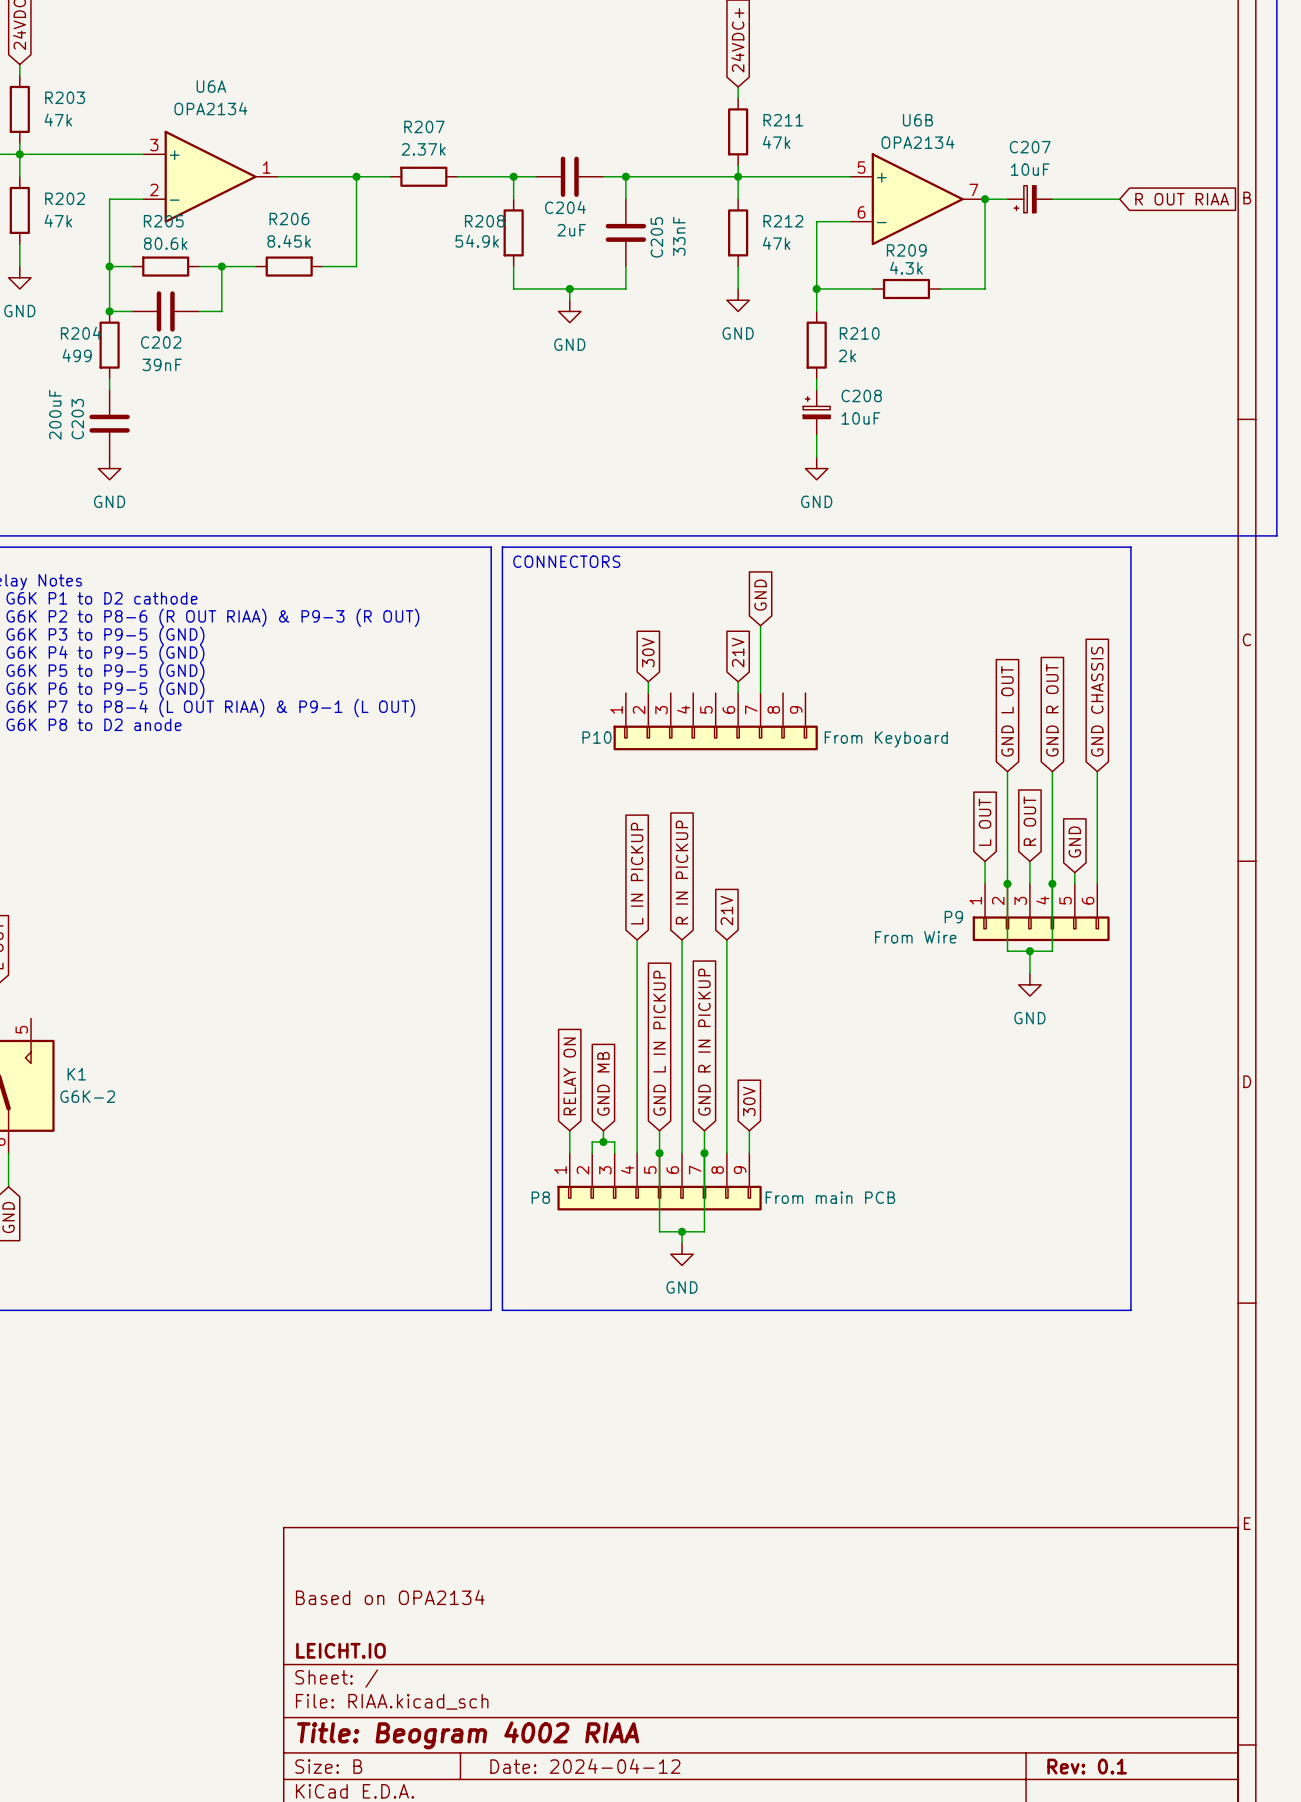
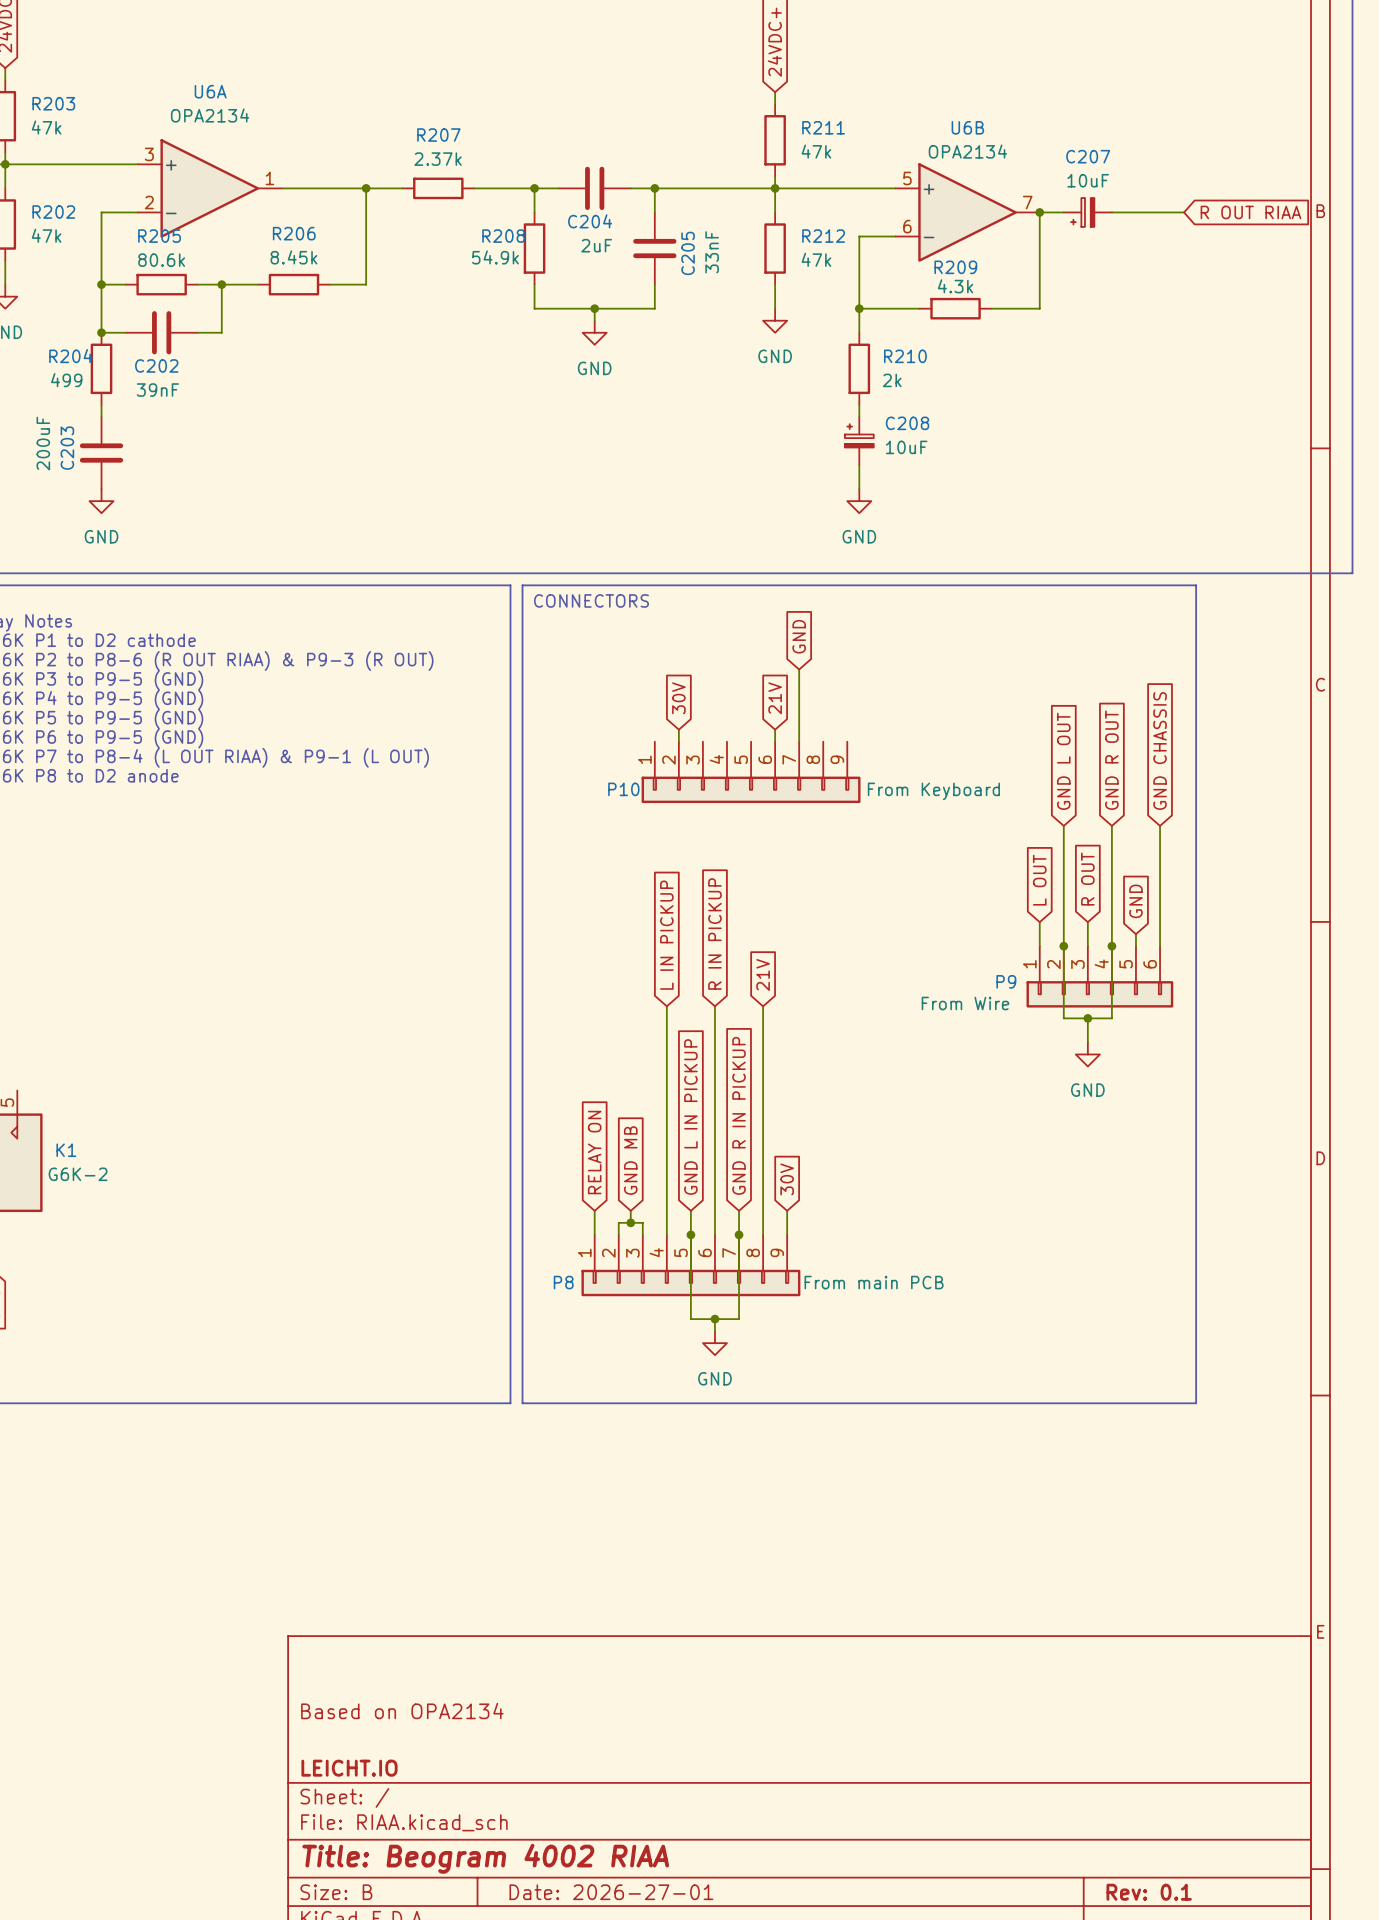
title block: Date: 2024-04-12 (585, 1766) -> Date: 2026-27-01 (611, 1892)

